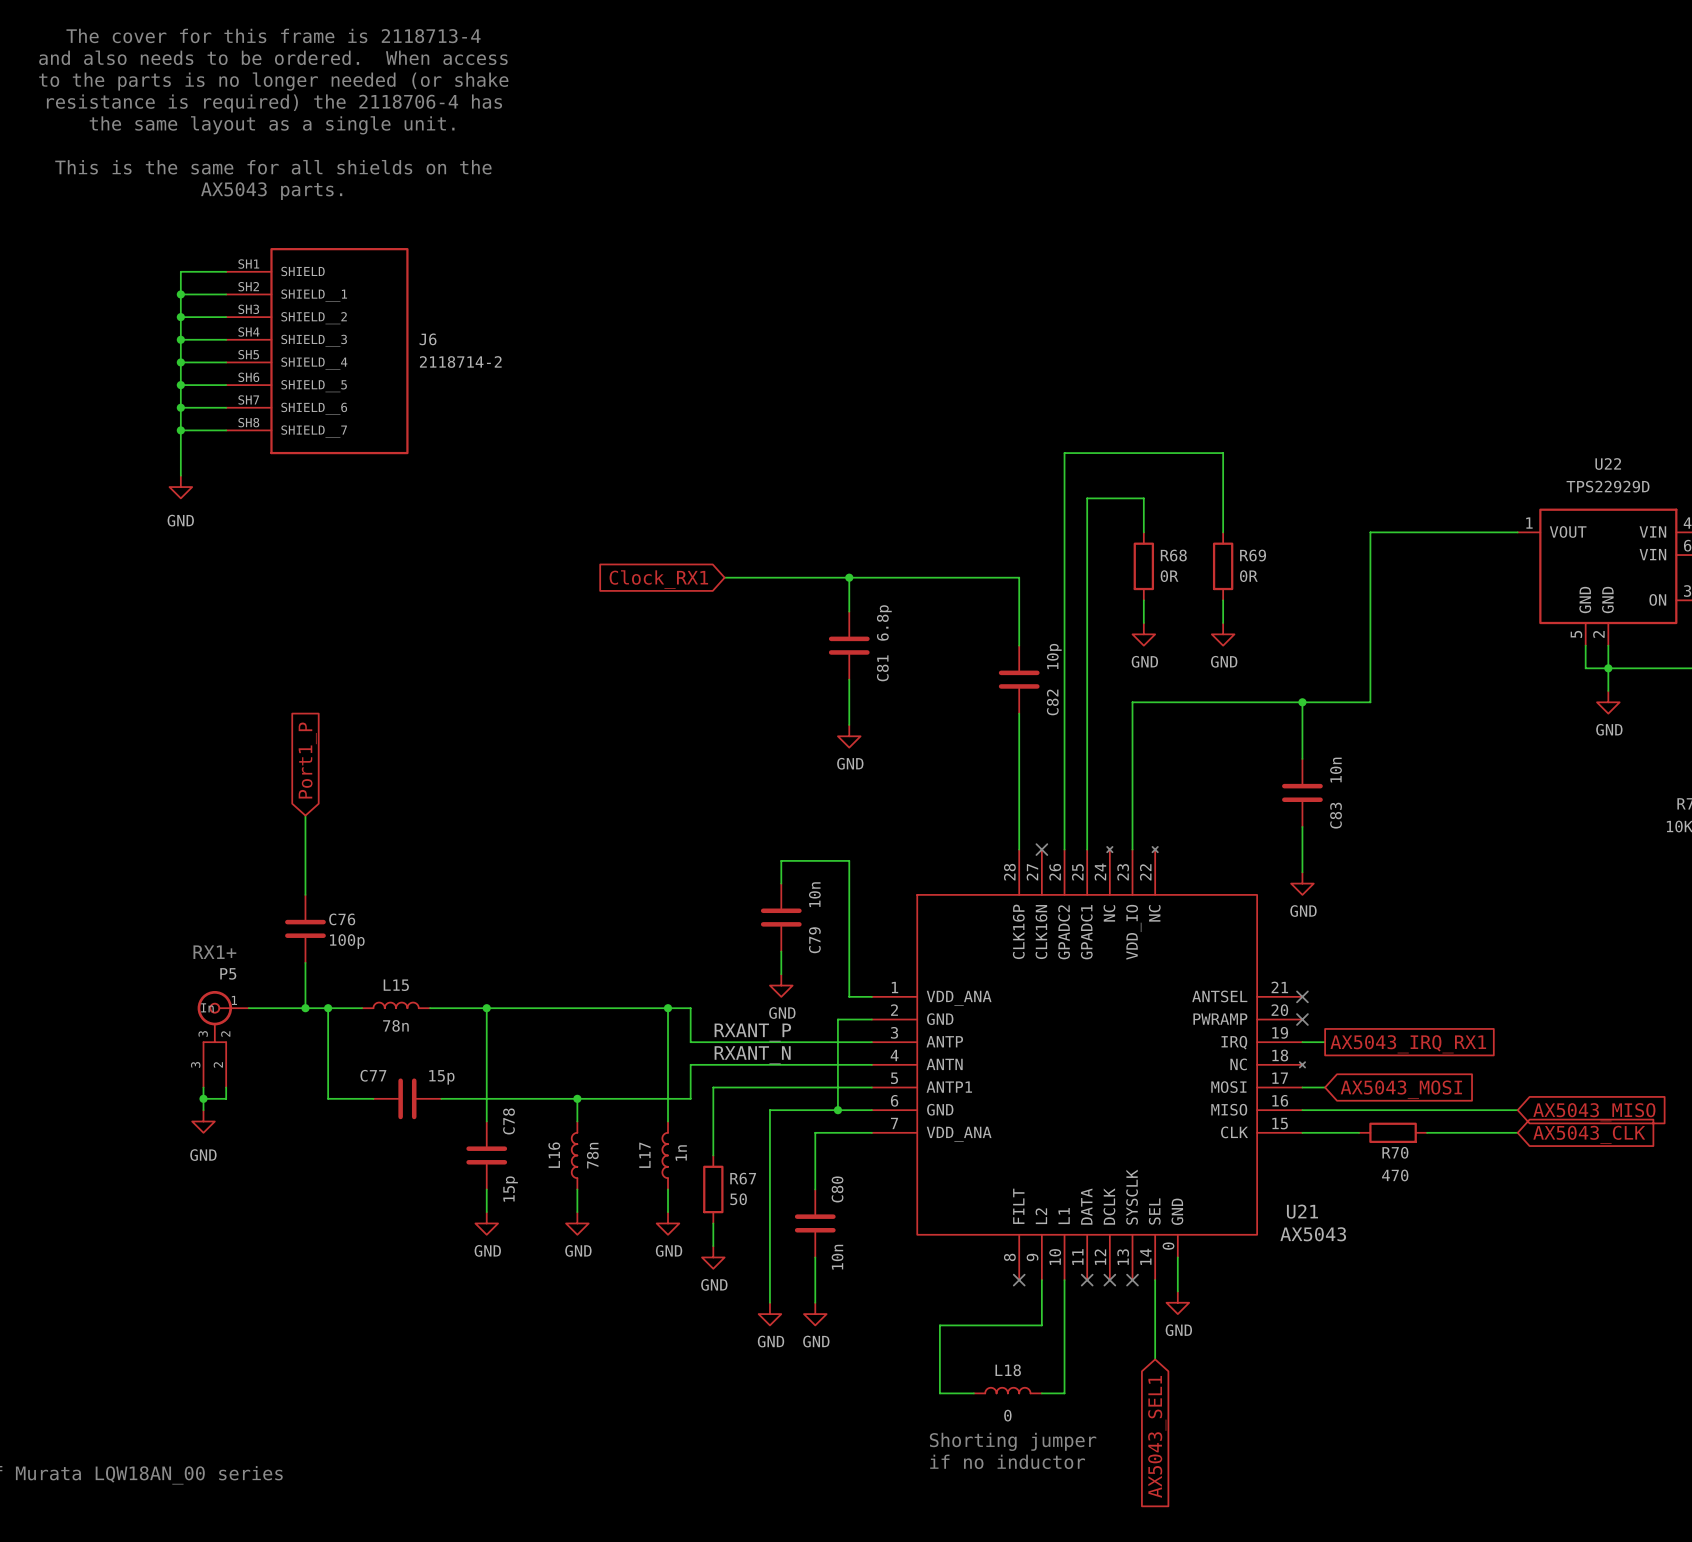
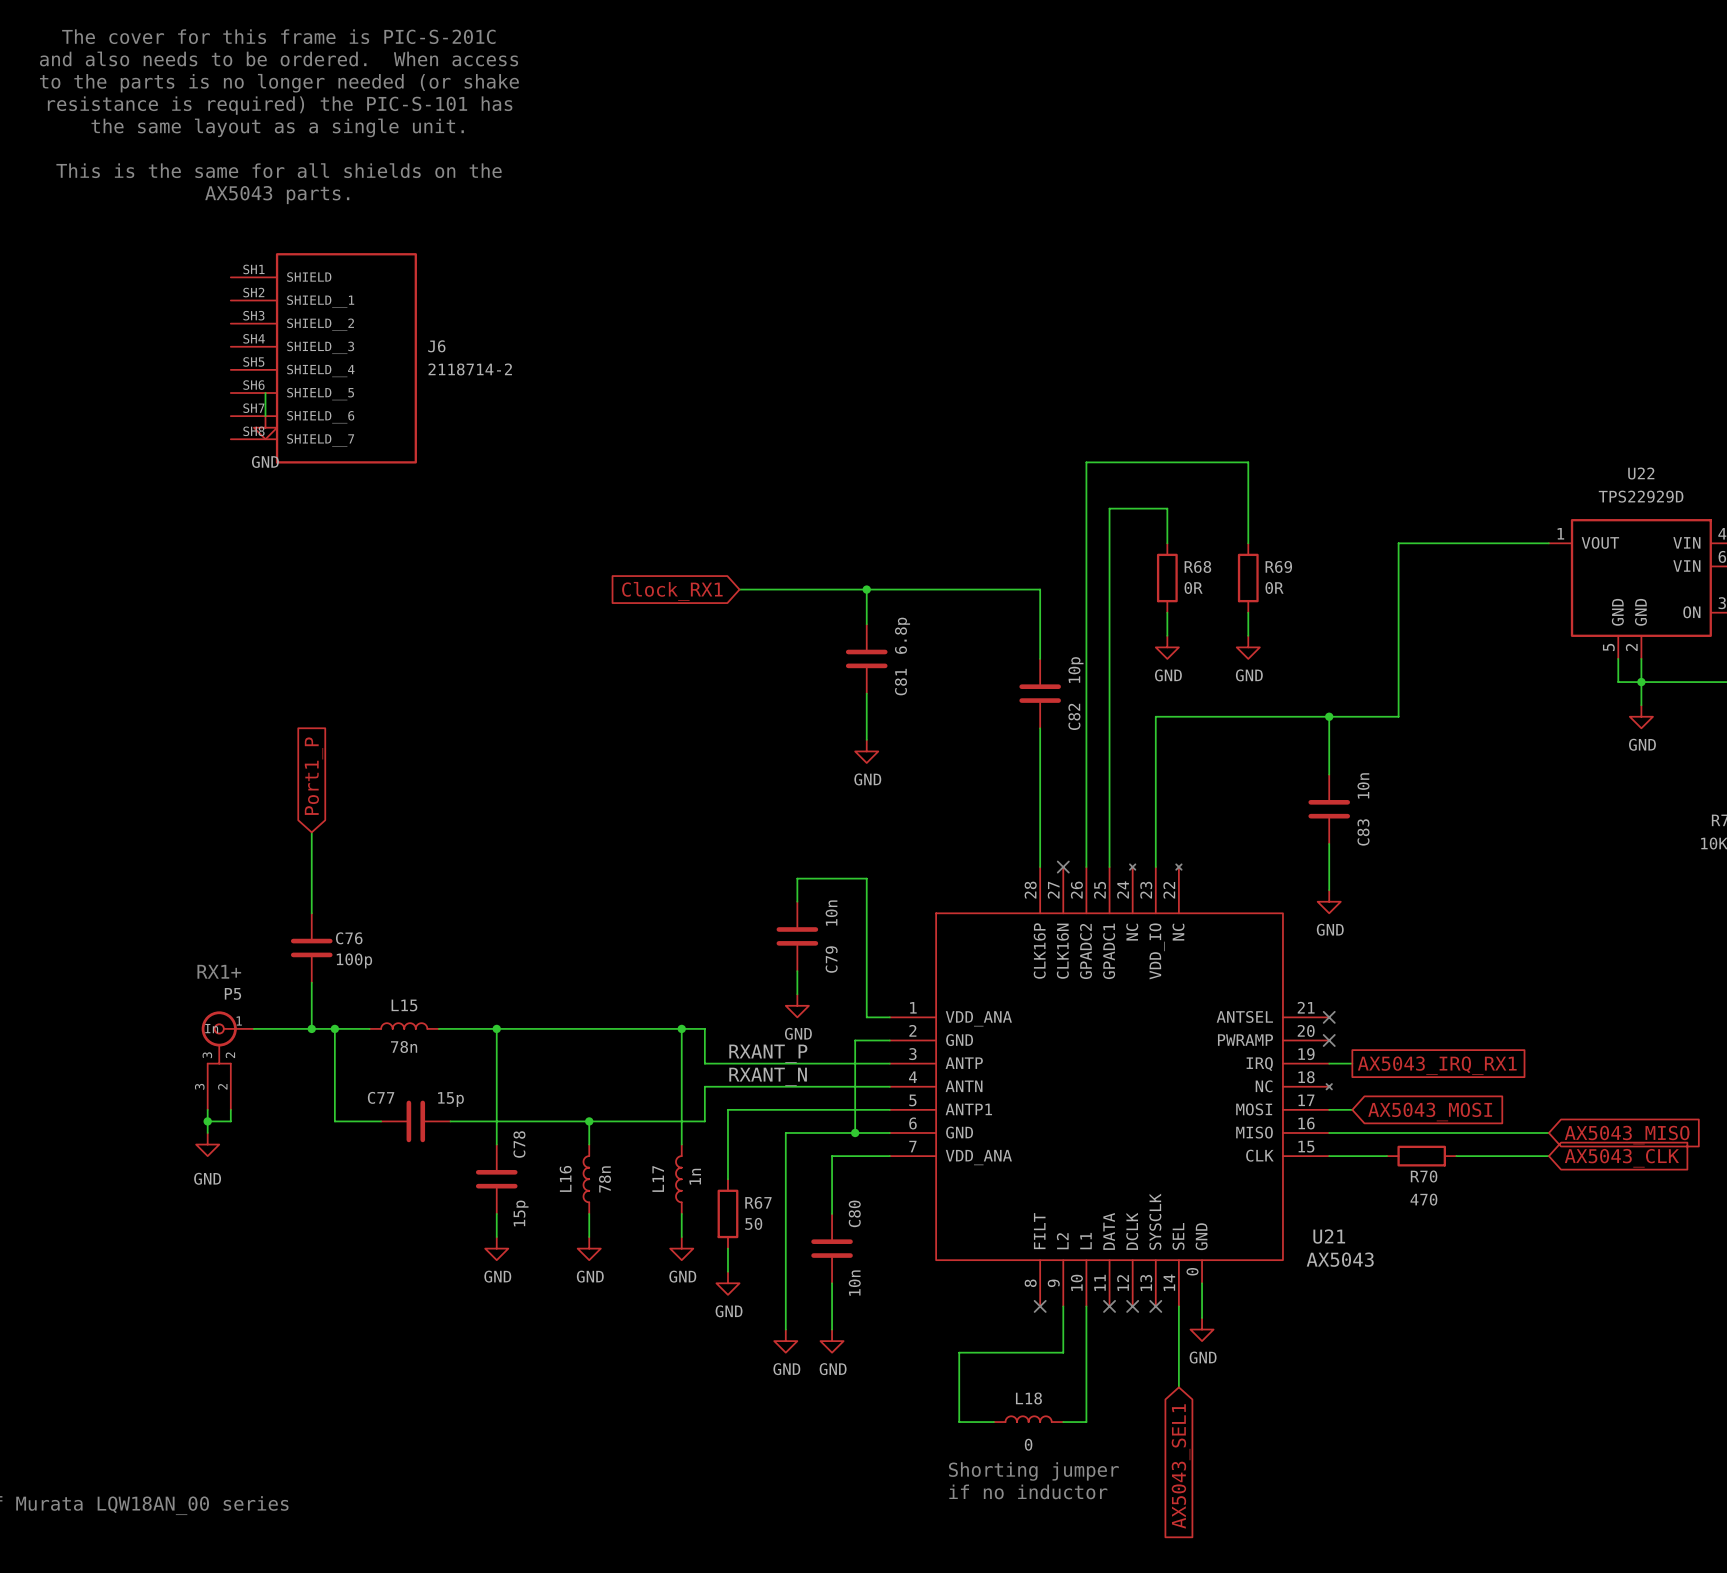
text: The cover for this frame is 2118713-4 (273, 35) -> The cover for this frame is PIC-S-201C (278, 36)
text: resistance is required) the 2118706-4 has (274, 103) -> resistance is required) the PIC-S-101 has (280, 105)
wire: (226, 271) (180, 271) (180, 475) -> none
wire: (180, 294) (226, 294) -> none
junction: (180, 294) -> none
wire: (180, 317) (226, 317) -> none
junction: (180, 317) -> none
wire: (180, 339) (226, 339) -> none
junction: (180, 339) -> none
wire: (180, 362) (226, 362) -> none
junction: (180, 362) -> none
wire: (180, 385) (226, 385) -> none
junction: (180, 385) -> none
wire: none -> (265, 393) (265, 416)
wire: (180, 407) (226, 407) -> none
junction: (180, 407) -> none
wire: (180, 430) (226, 430) -> none
junction: (180, 430) -> none
power symbol position: GND (180, 487) -> GND (265, 427)

